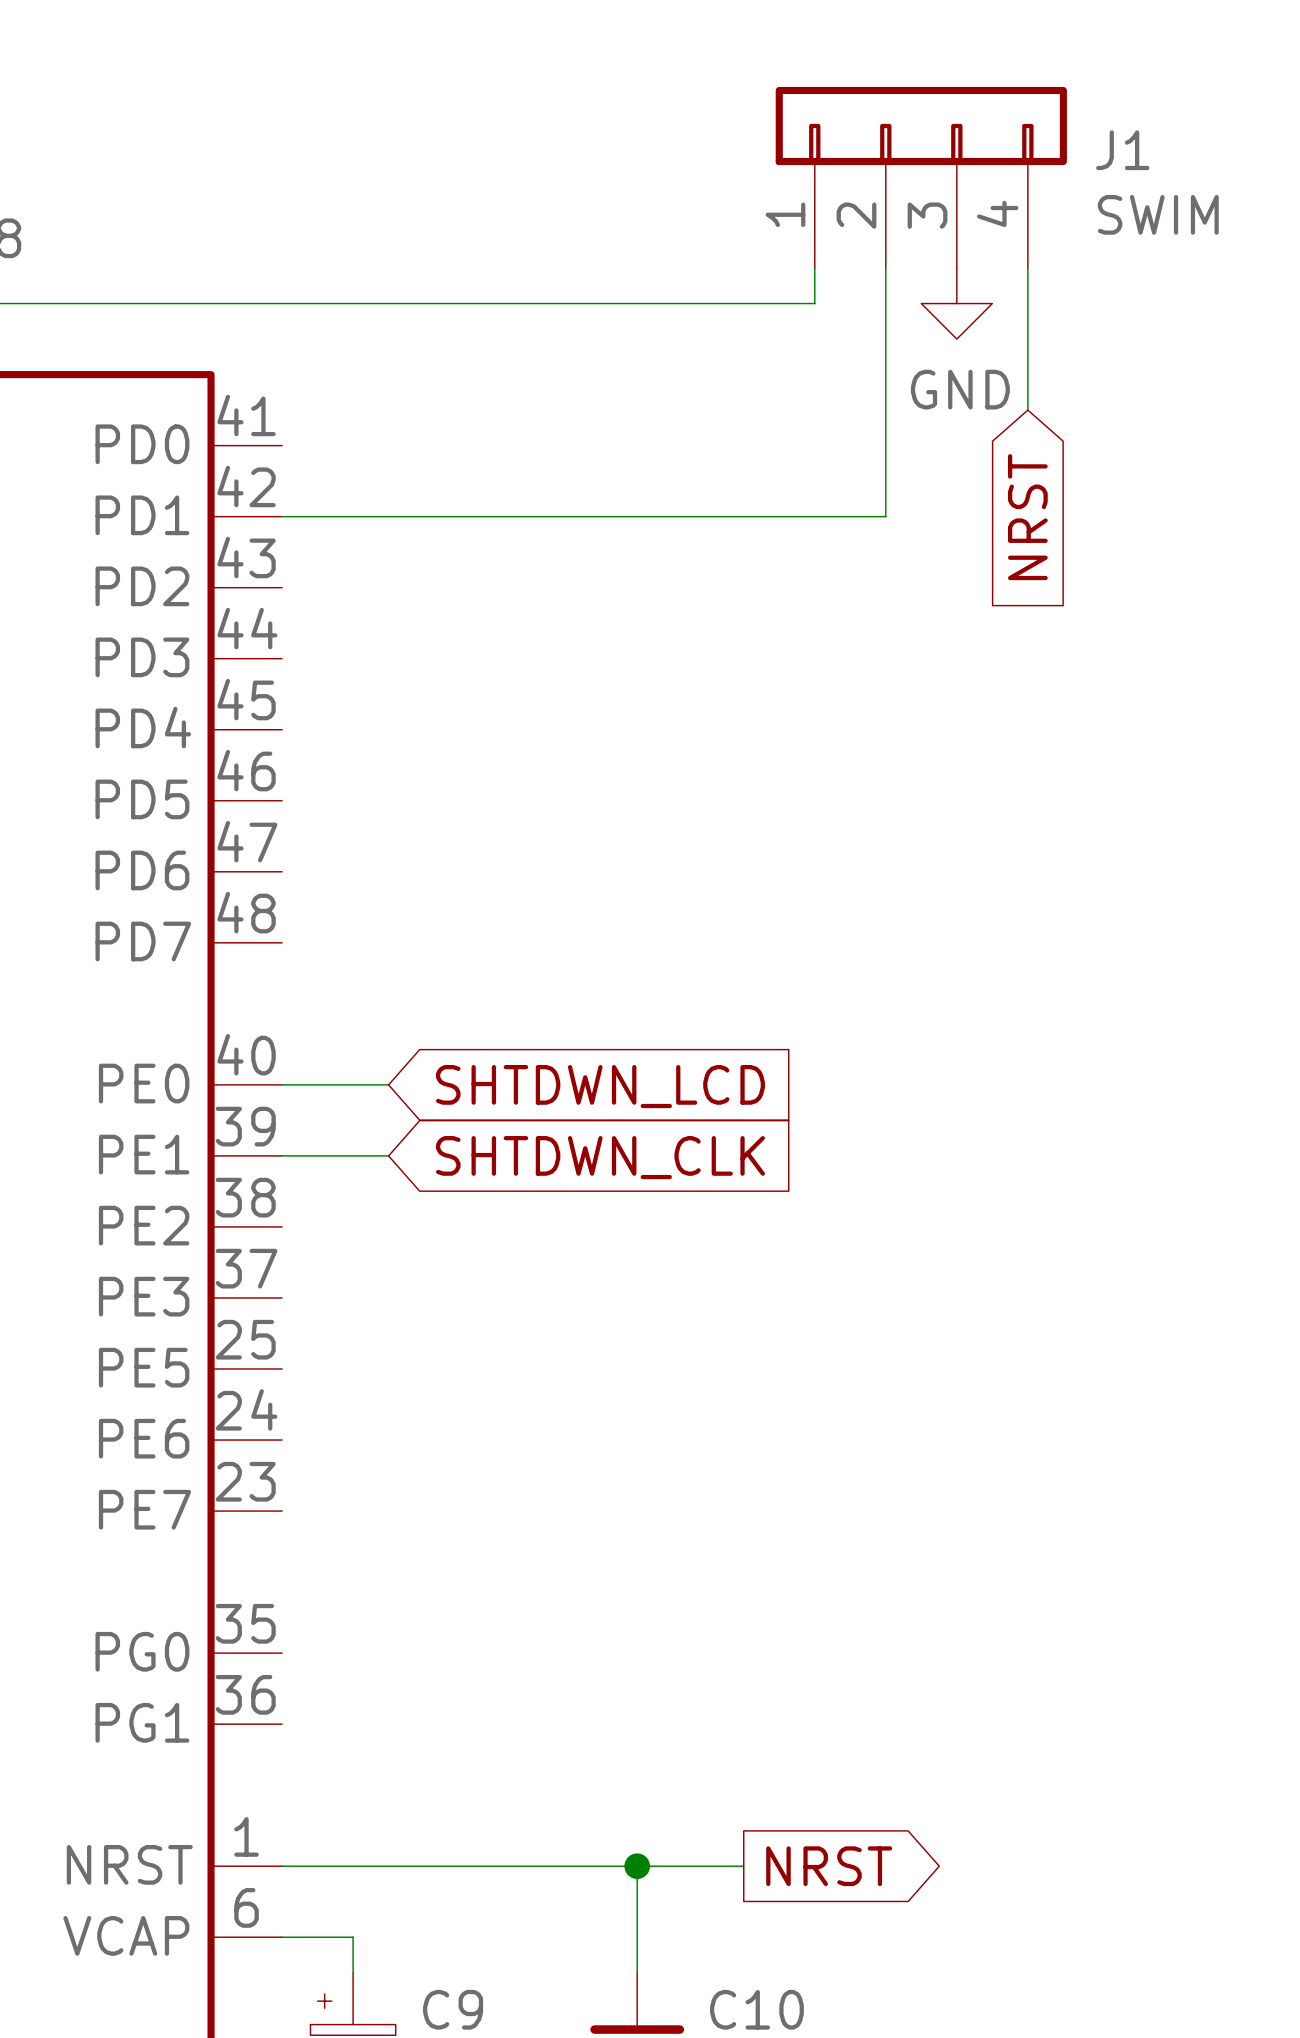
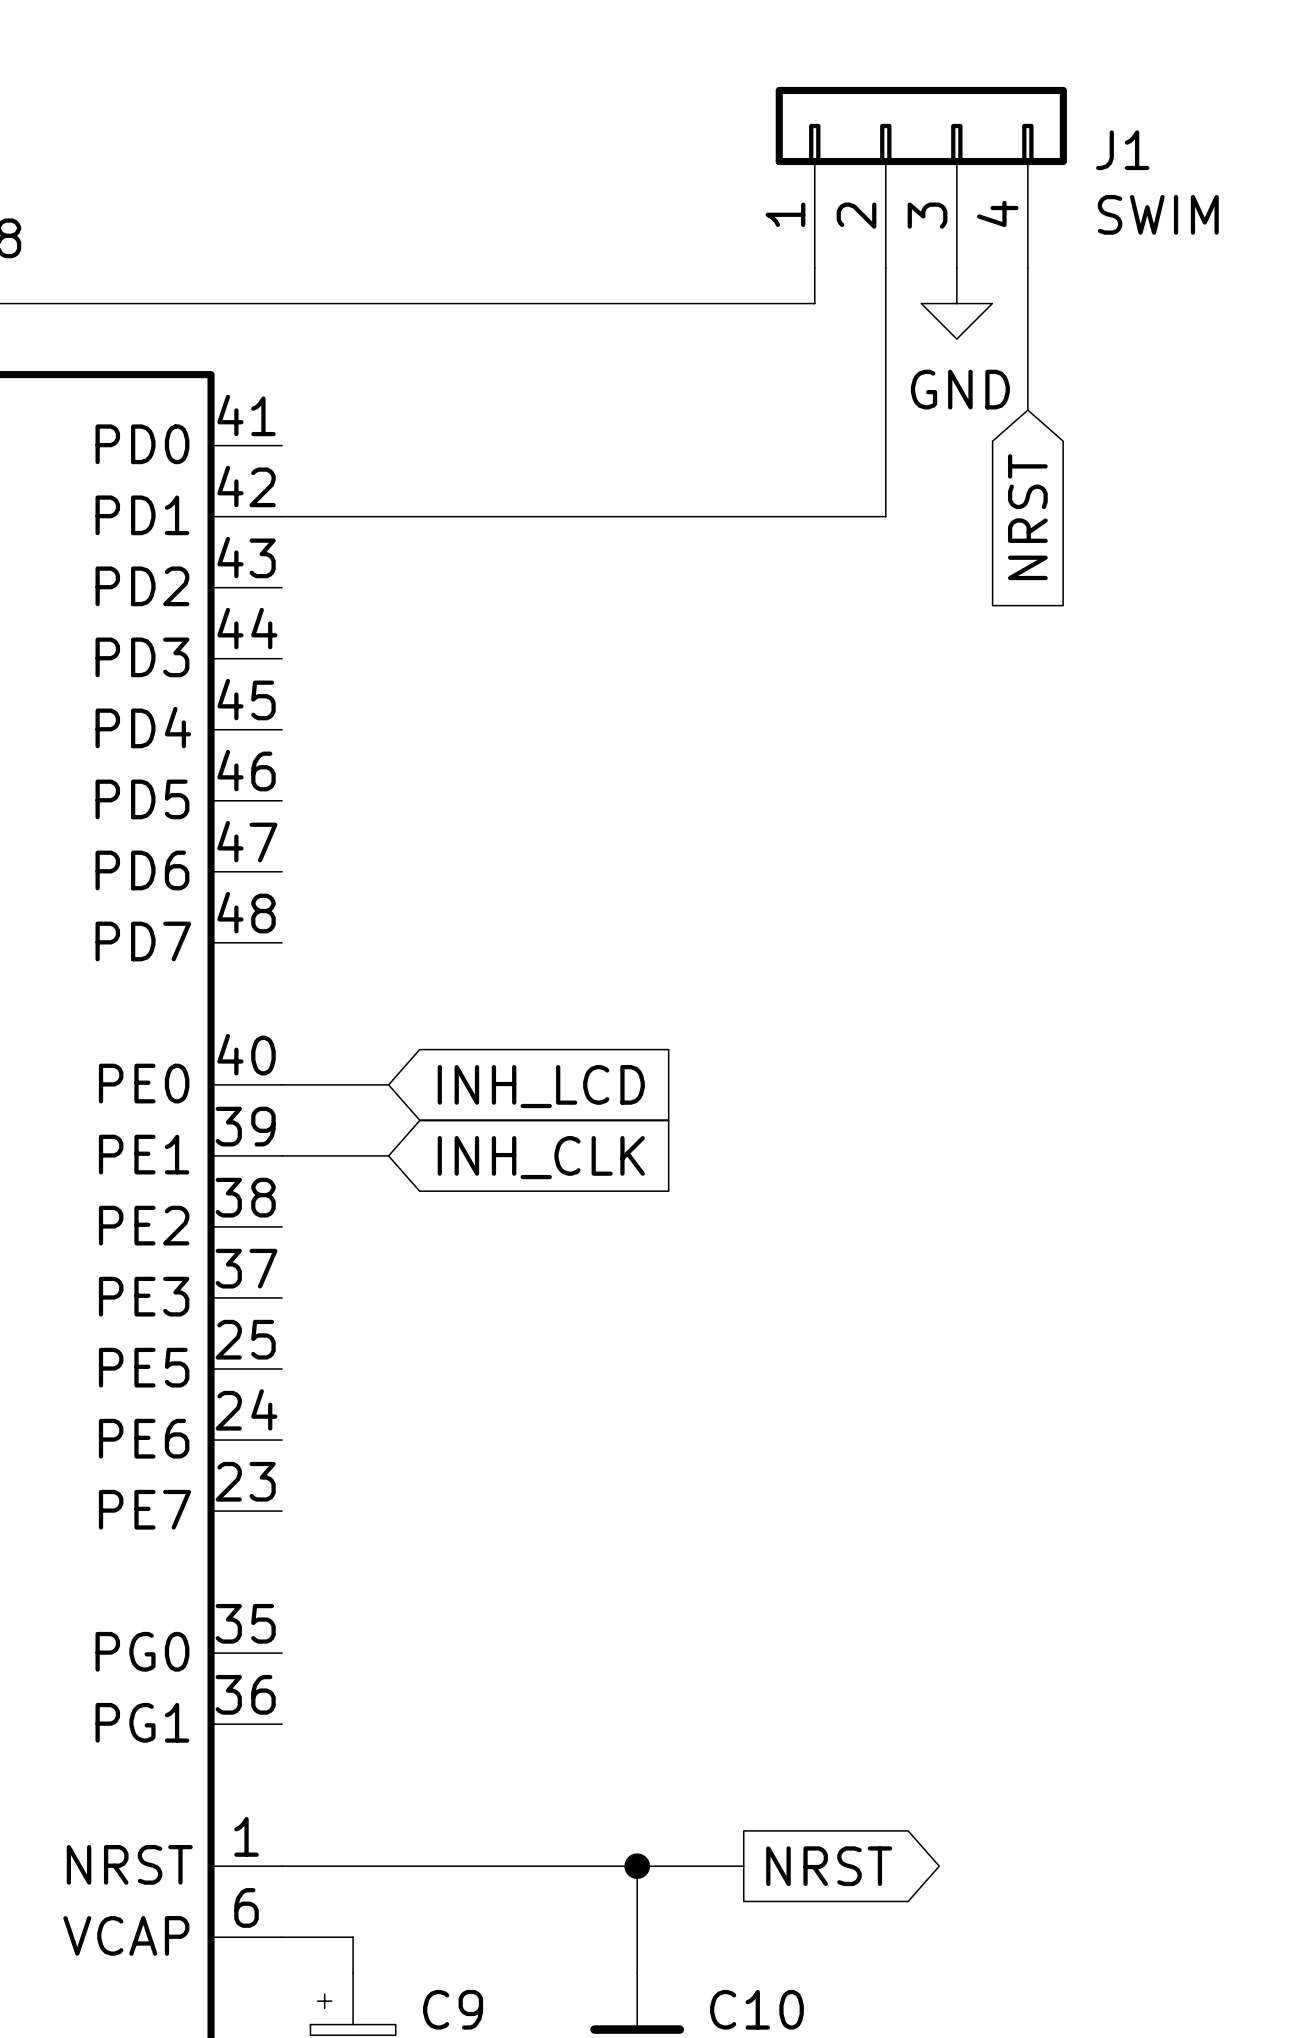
global label: SHTDWN_LCD (600, 1086) -> INH_LCD (541, 1086)
global label: SHTDWN_CLK (600, 1157) -> INH_CLK (541, 1157)

